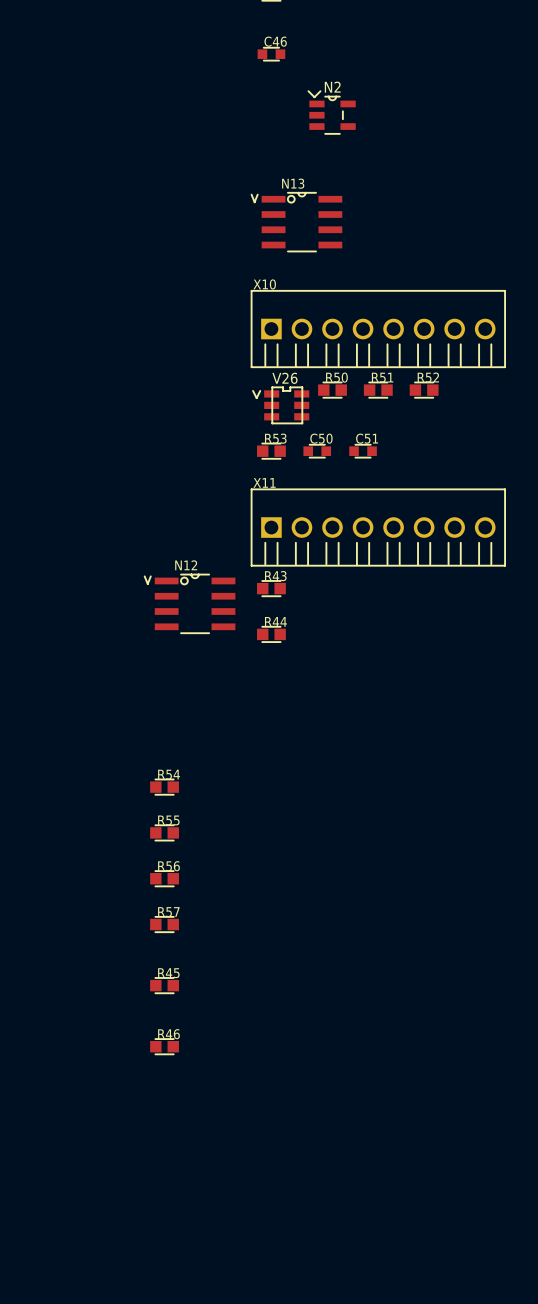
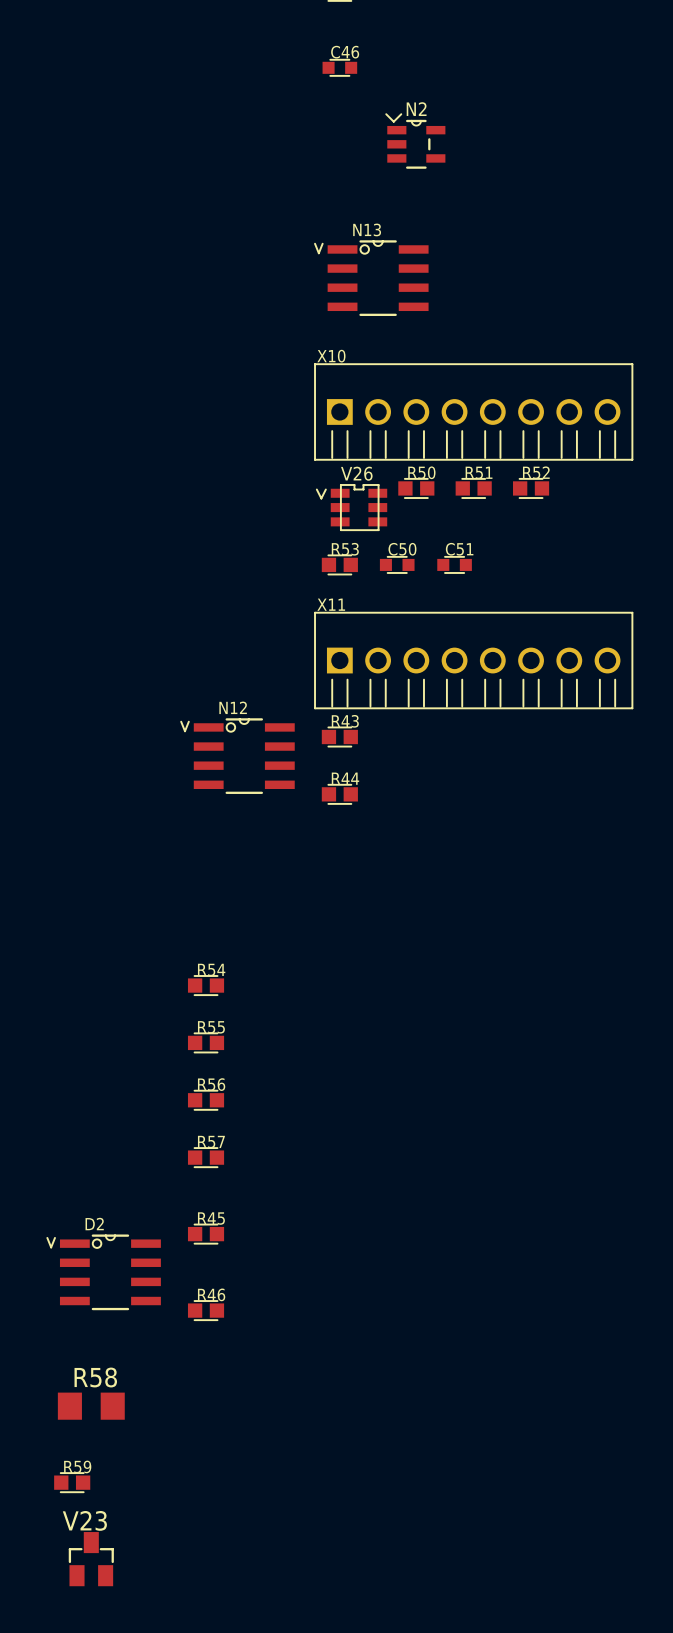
D2: none -> (103, 1272)
R58: none -> (91, 1406)
R59: none -> (72, 1482)
V23: none -> (91, 1559)

